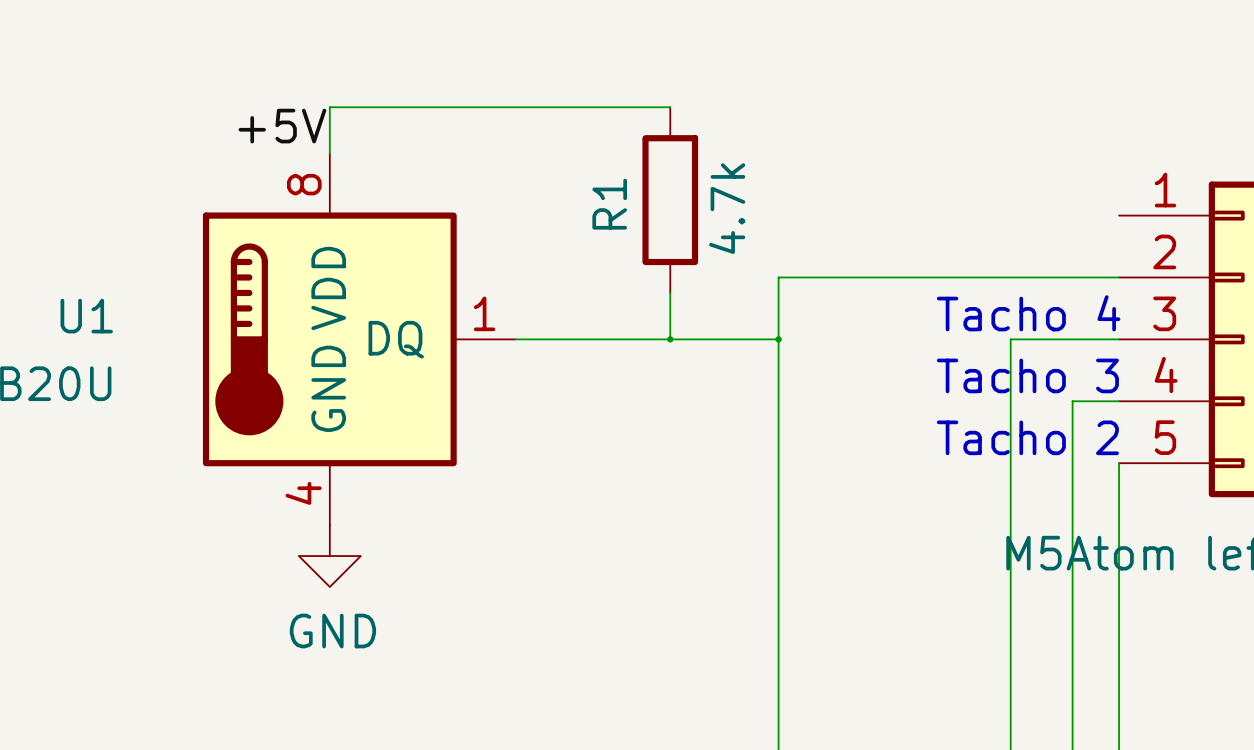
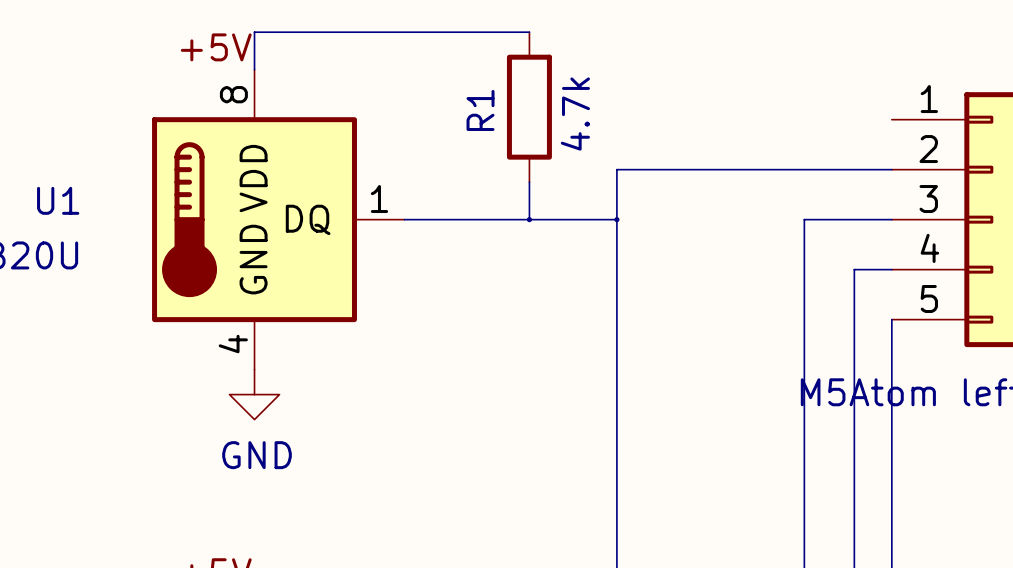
text: Tacho 4 (1028, 313) -> none
text: Tacho 3 (1027, 375) -> none
text: Tacho 2 (1027, 437) -> none

